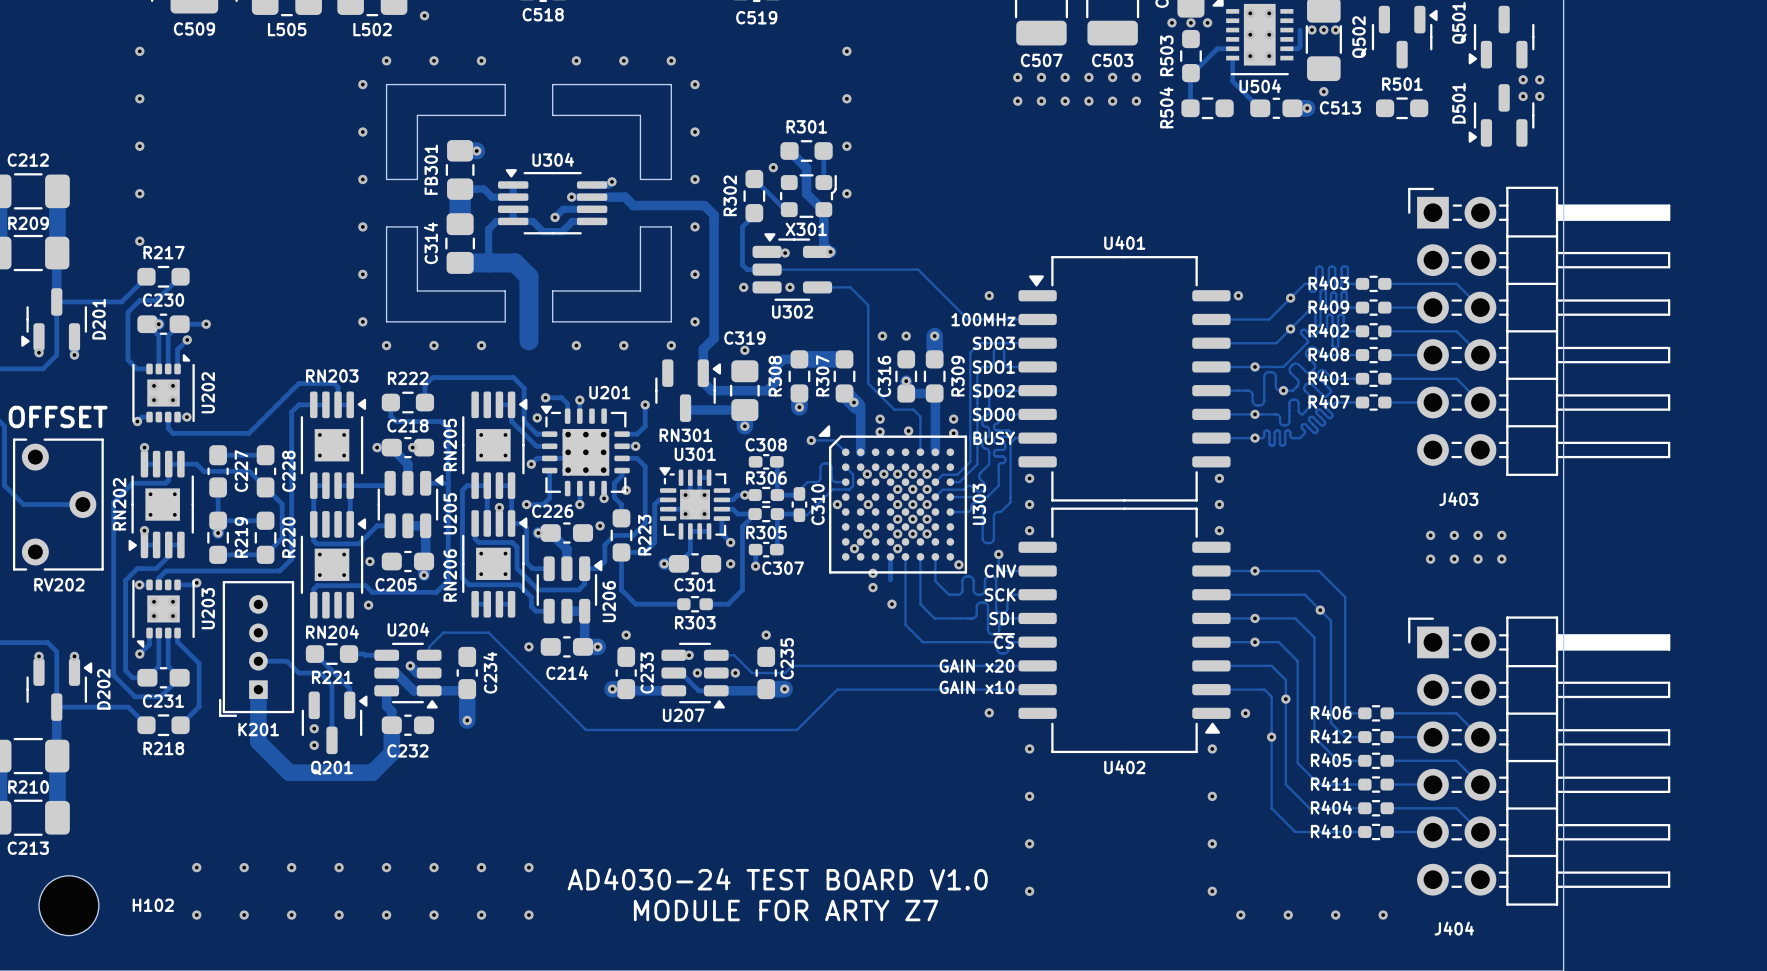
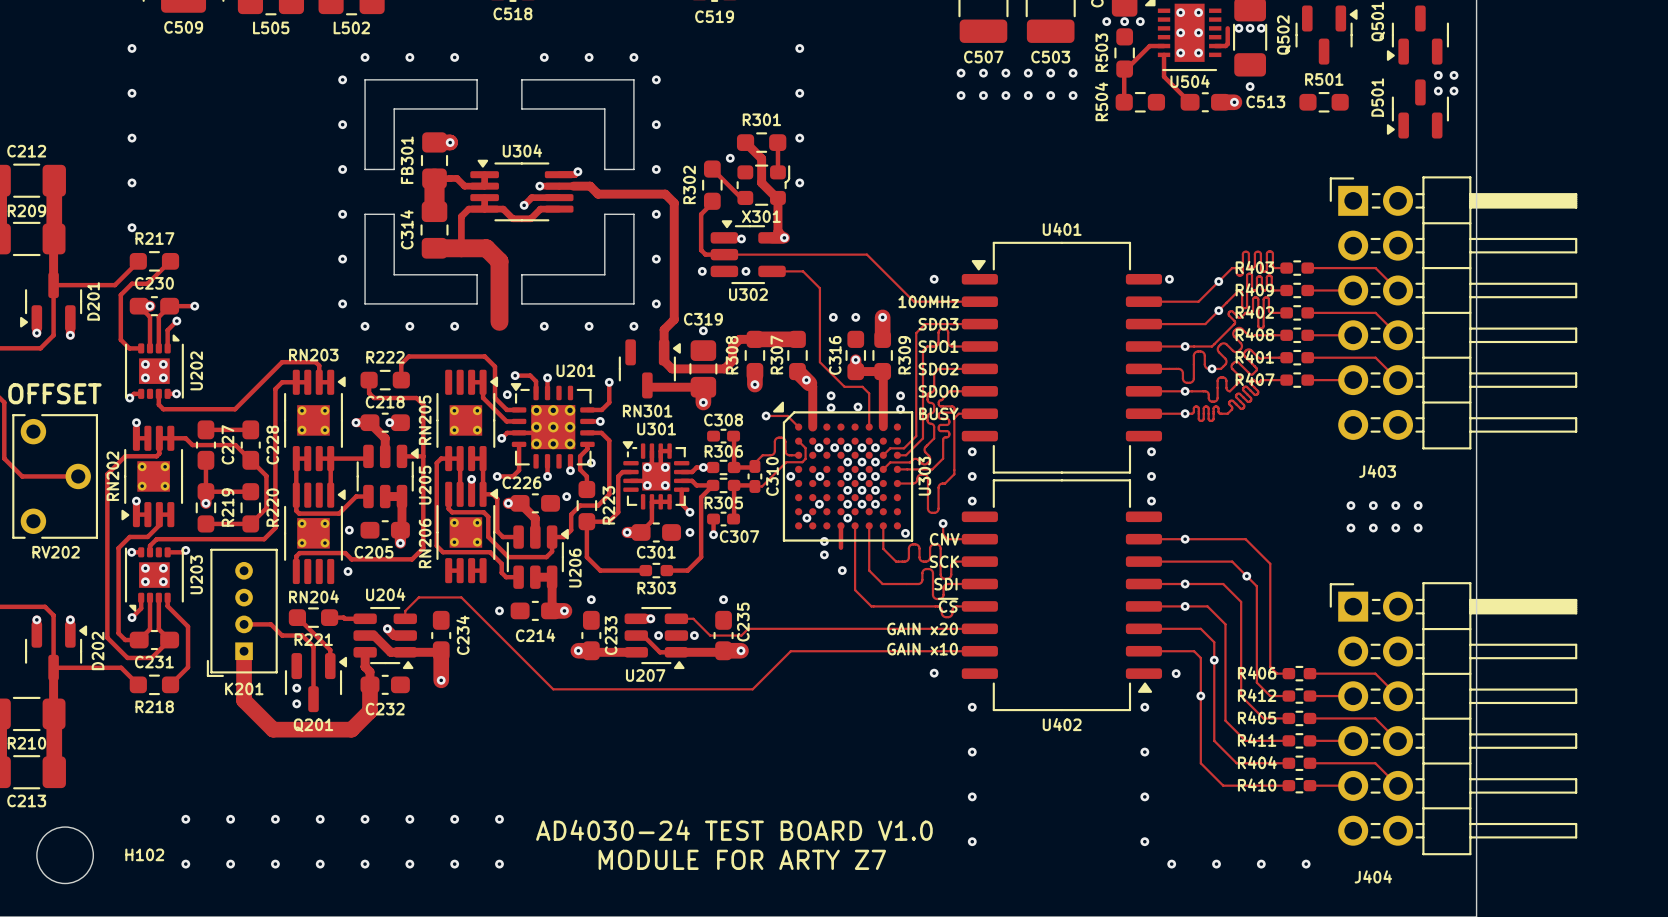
via: (424, 15) -> none

